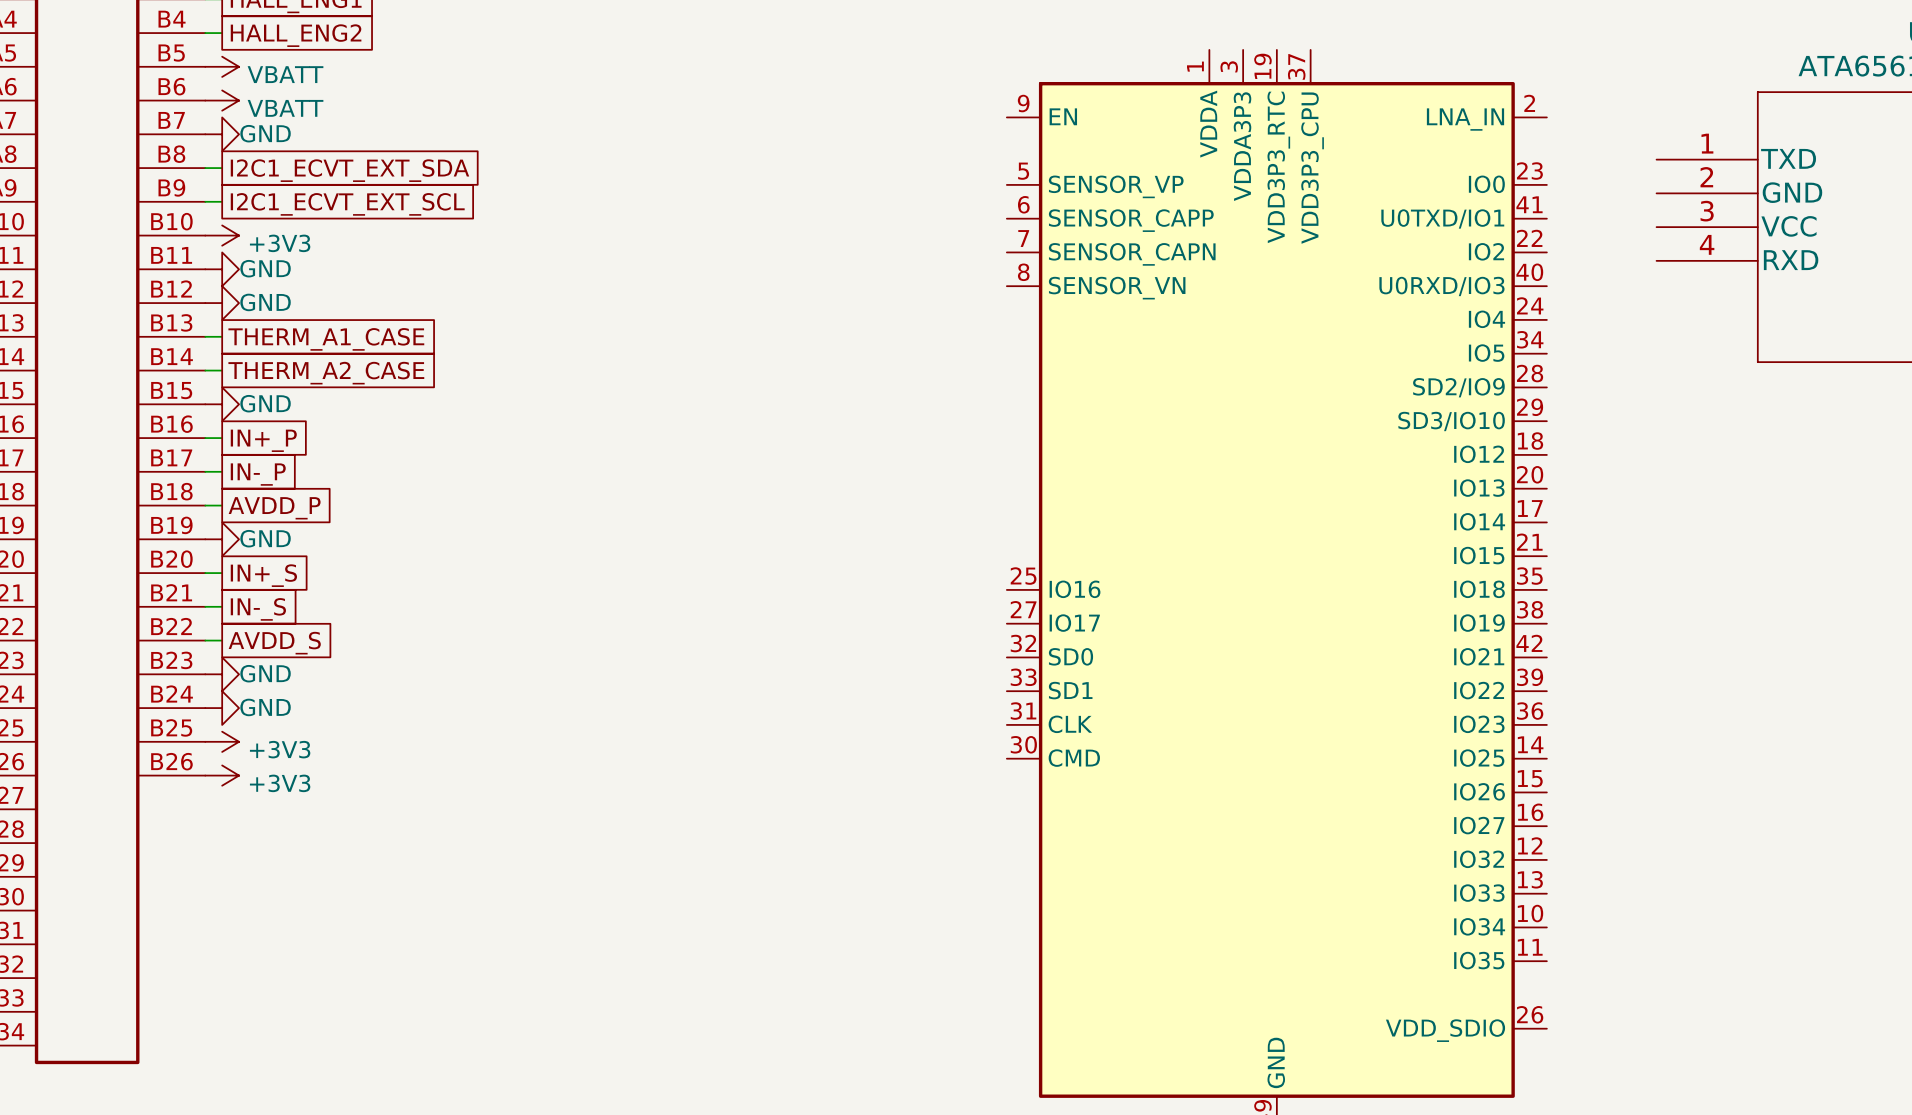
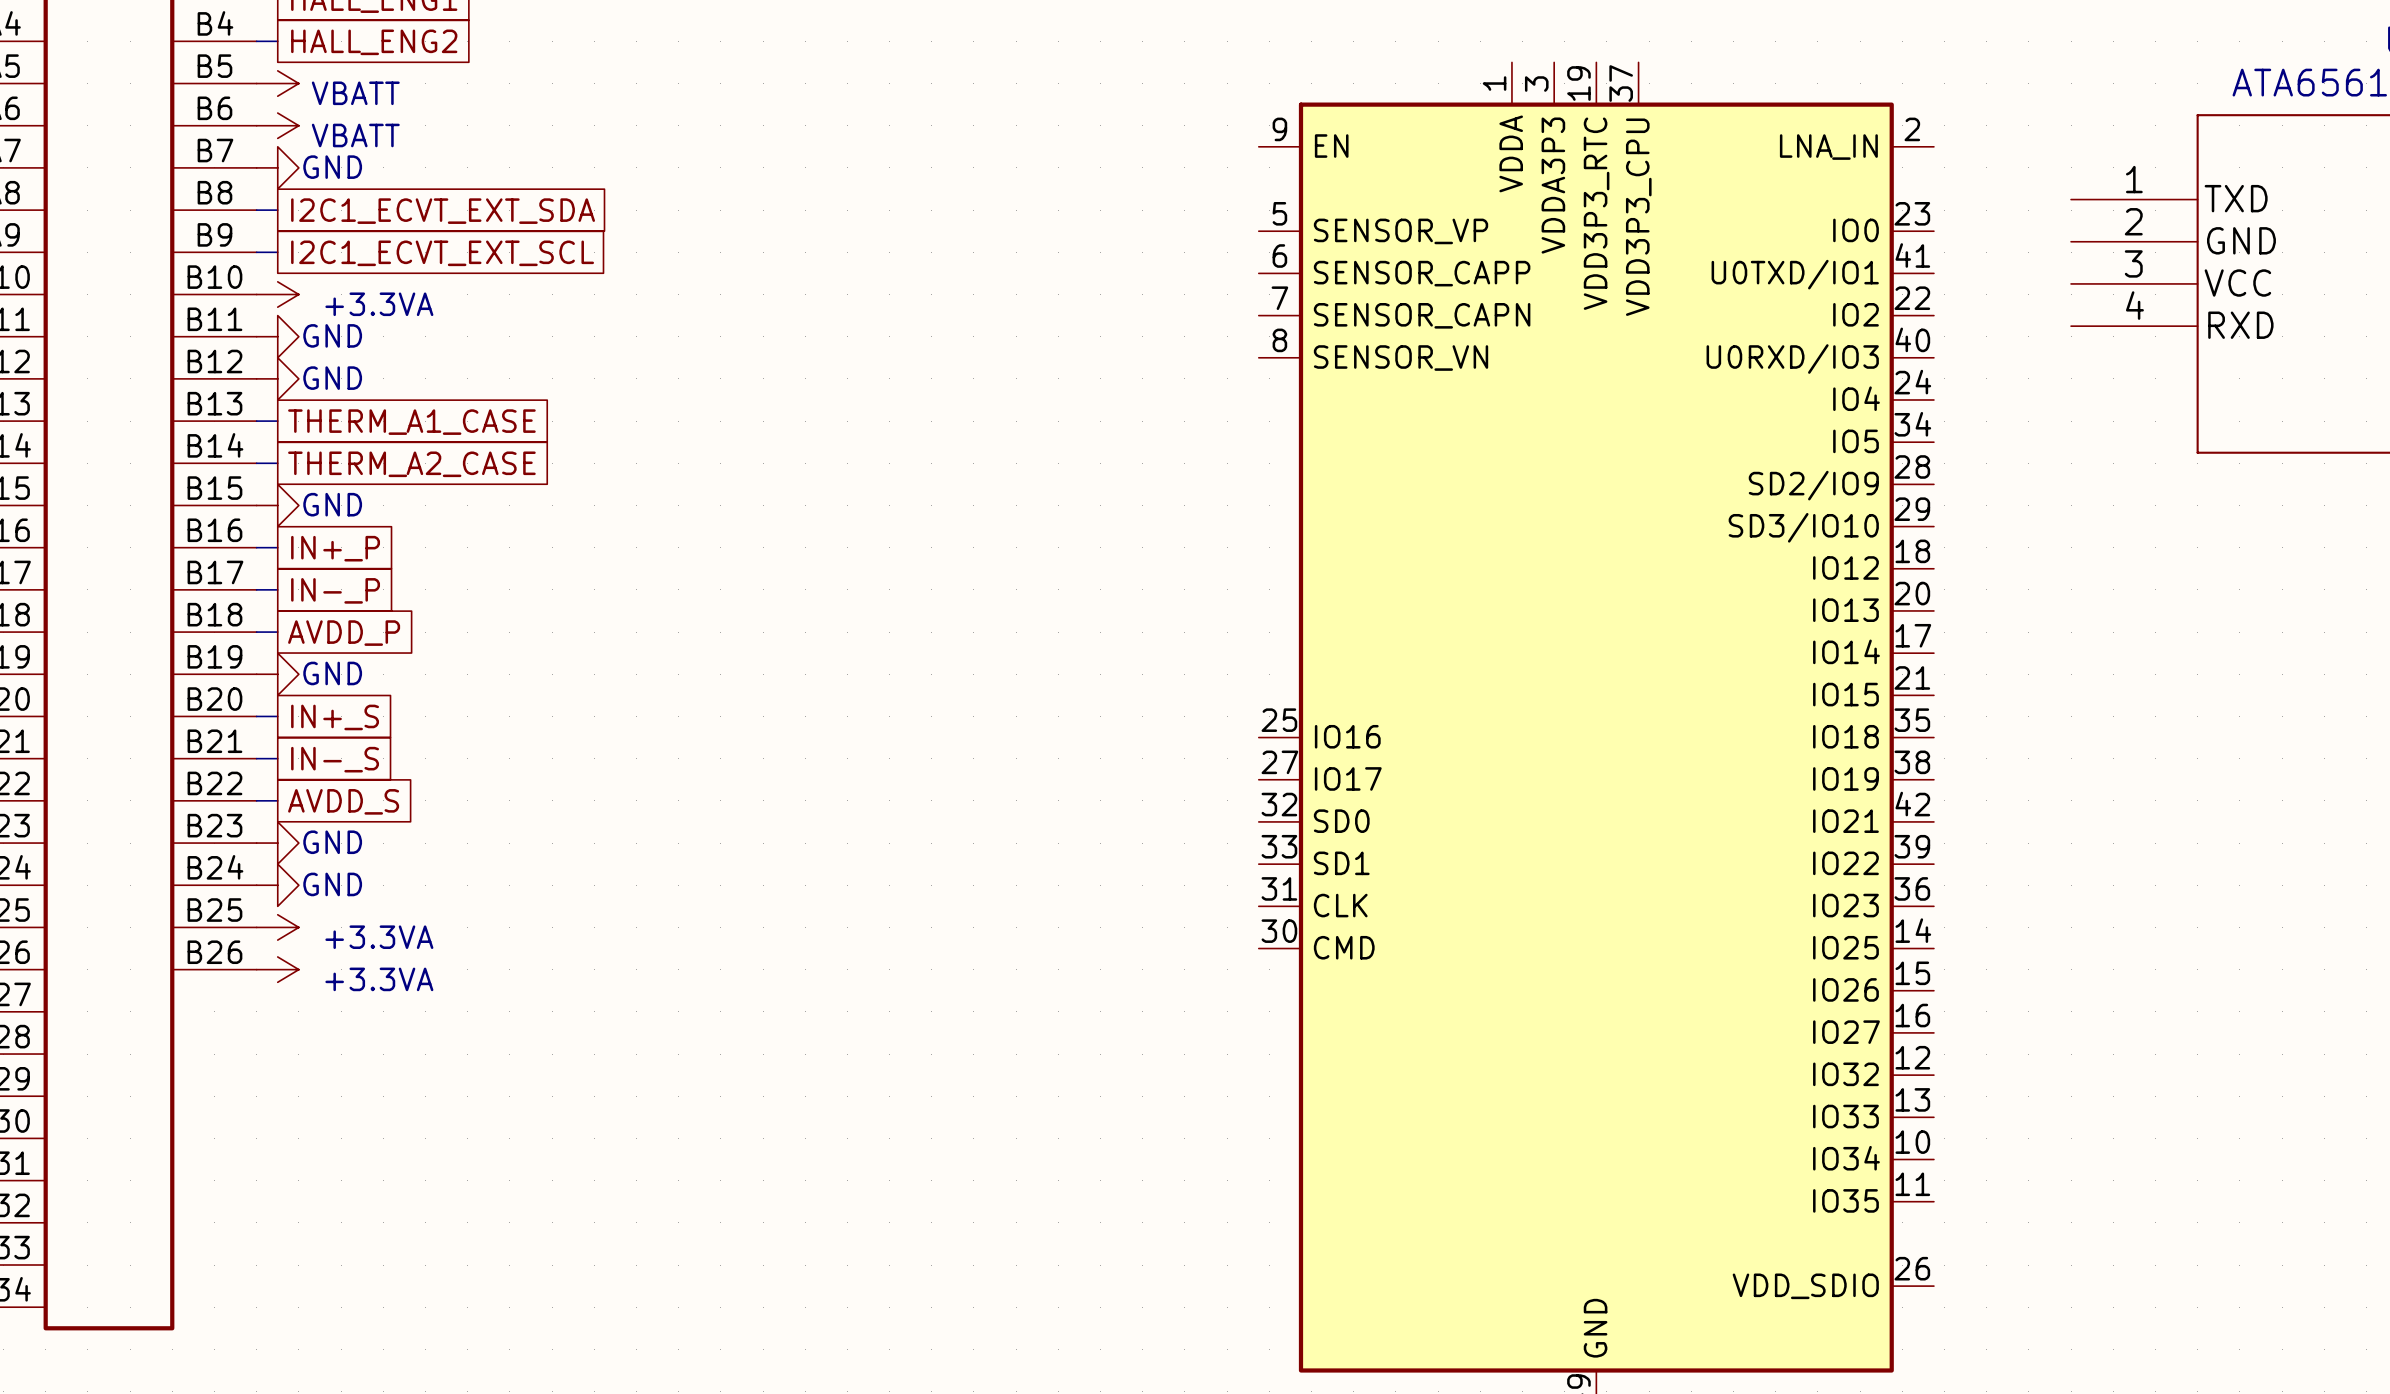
power symbol: +3V3 (222, 235) -> +3.3VA (277, 294)
power symbol: +3V3 (222, 741) -> +3.3VA (277, 927)
power symbol: +3V3 (222, 775) -> +3.3VA (277, 969)

